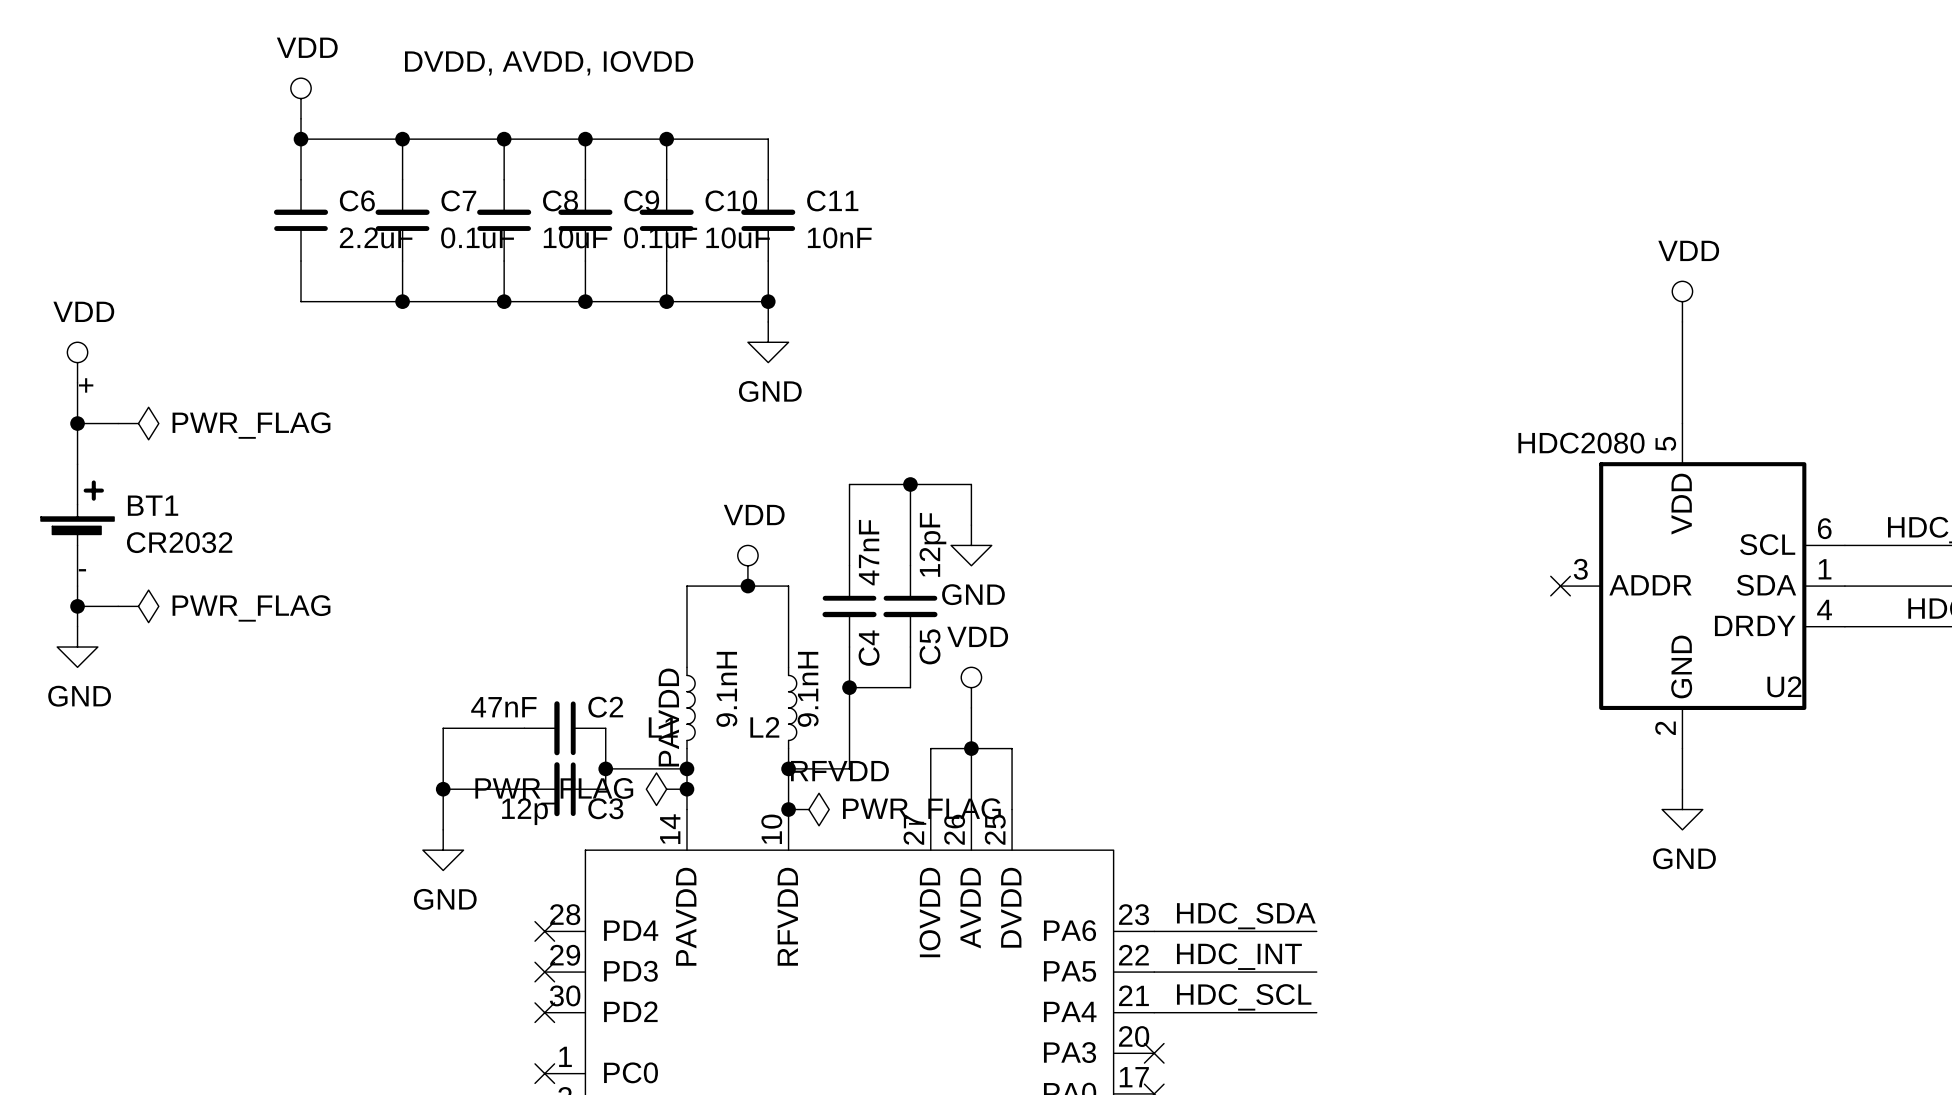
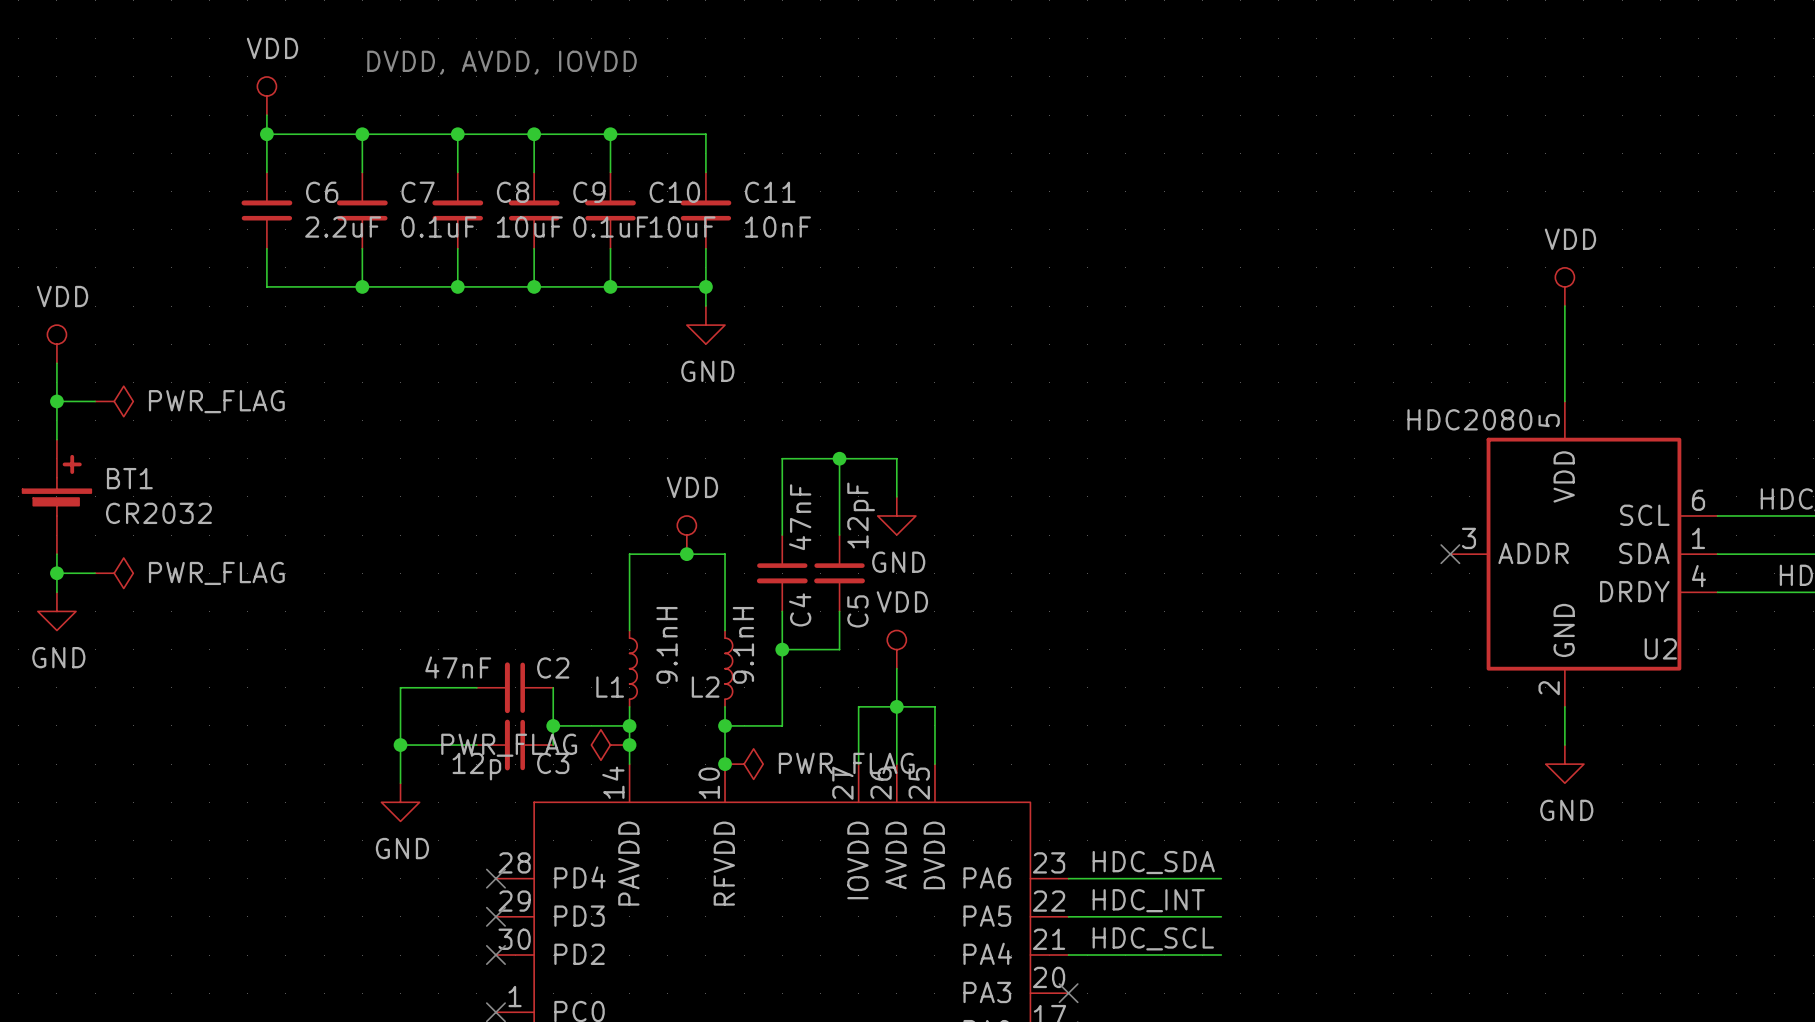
label: + (86, 385) -> none
label: - (82, 570) -> none
label: PAVDD (668, 717) -> none
label: RFVDD (839, 771) -> none

